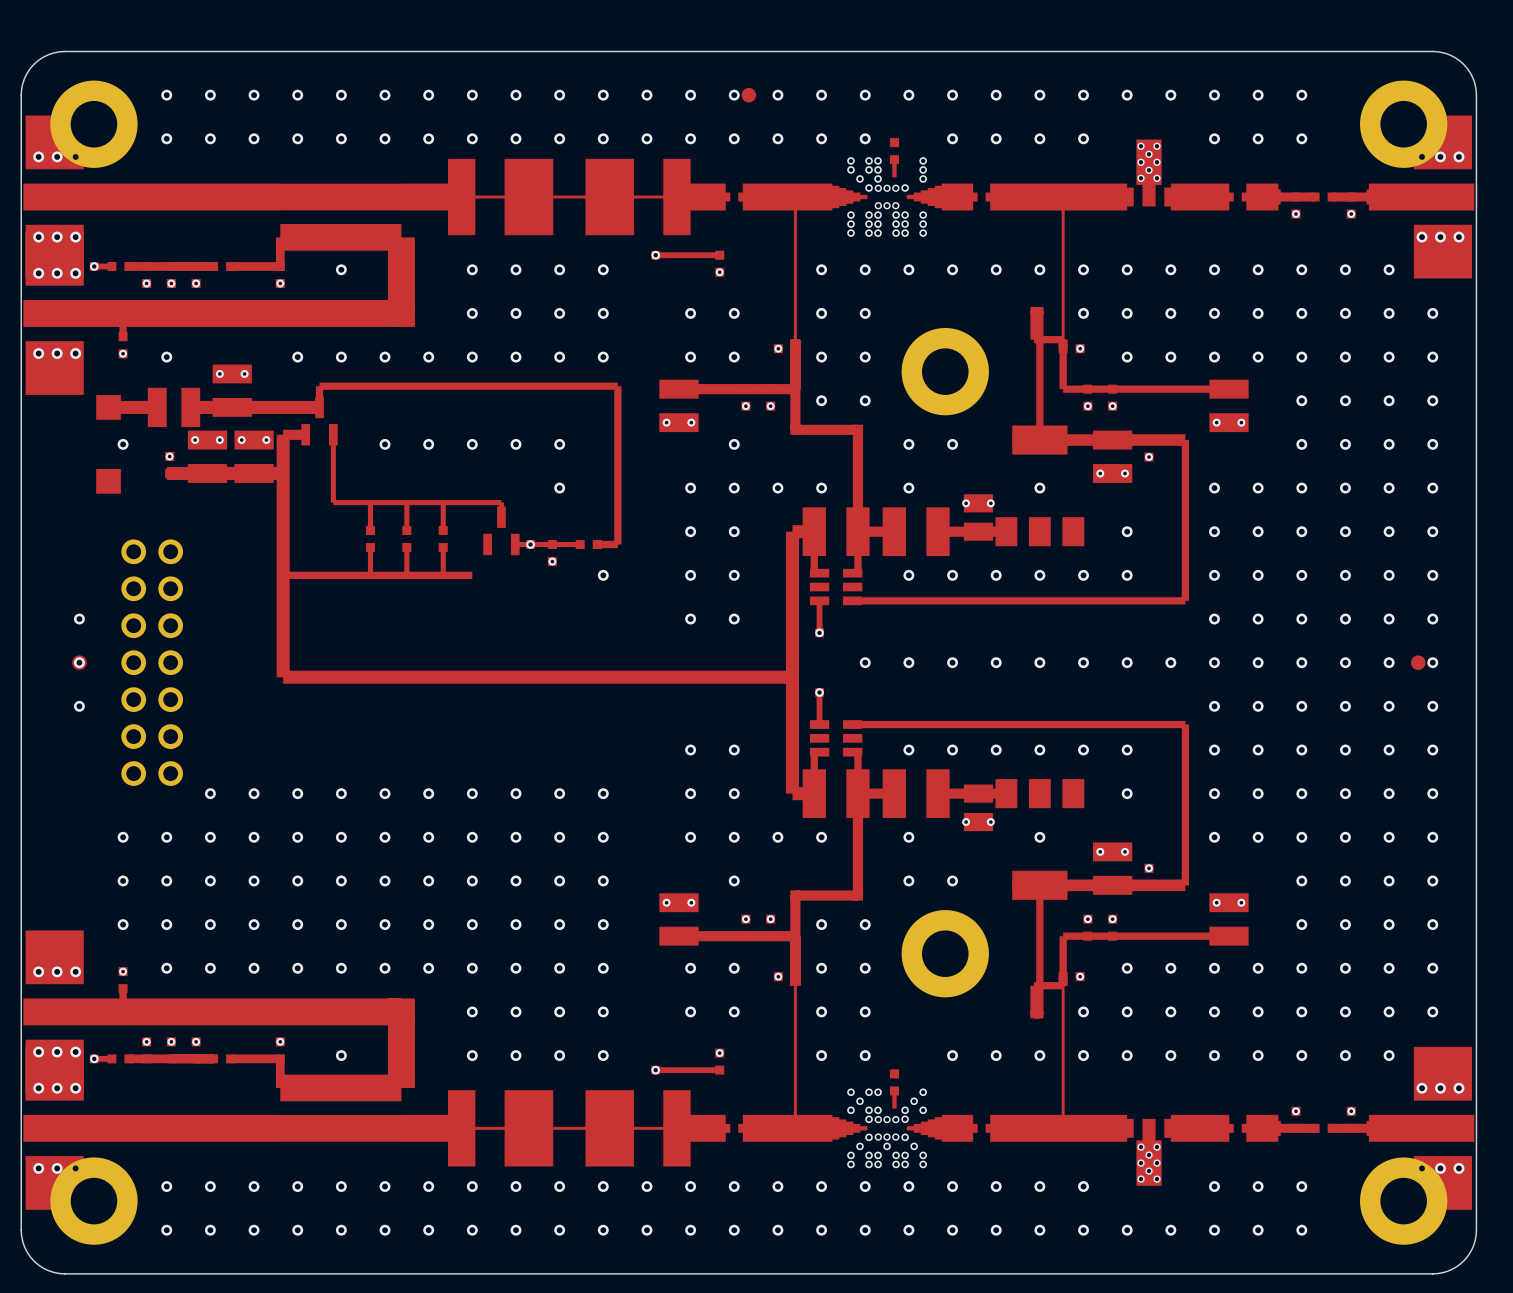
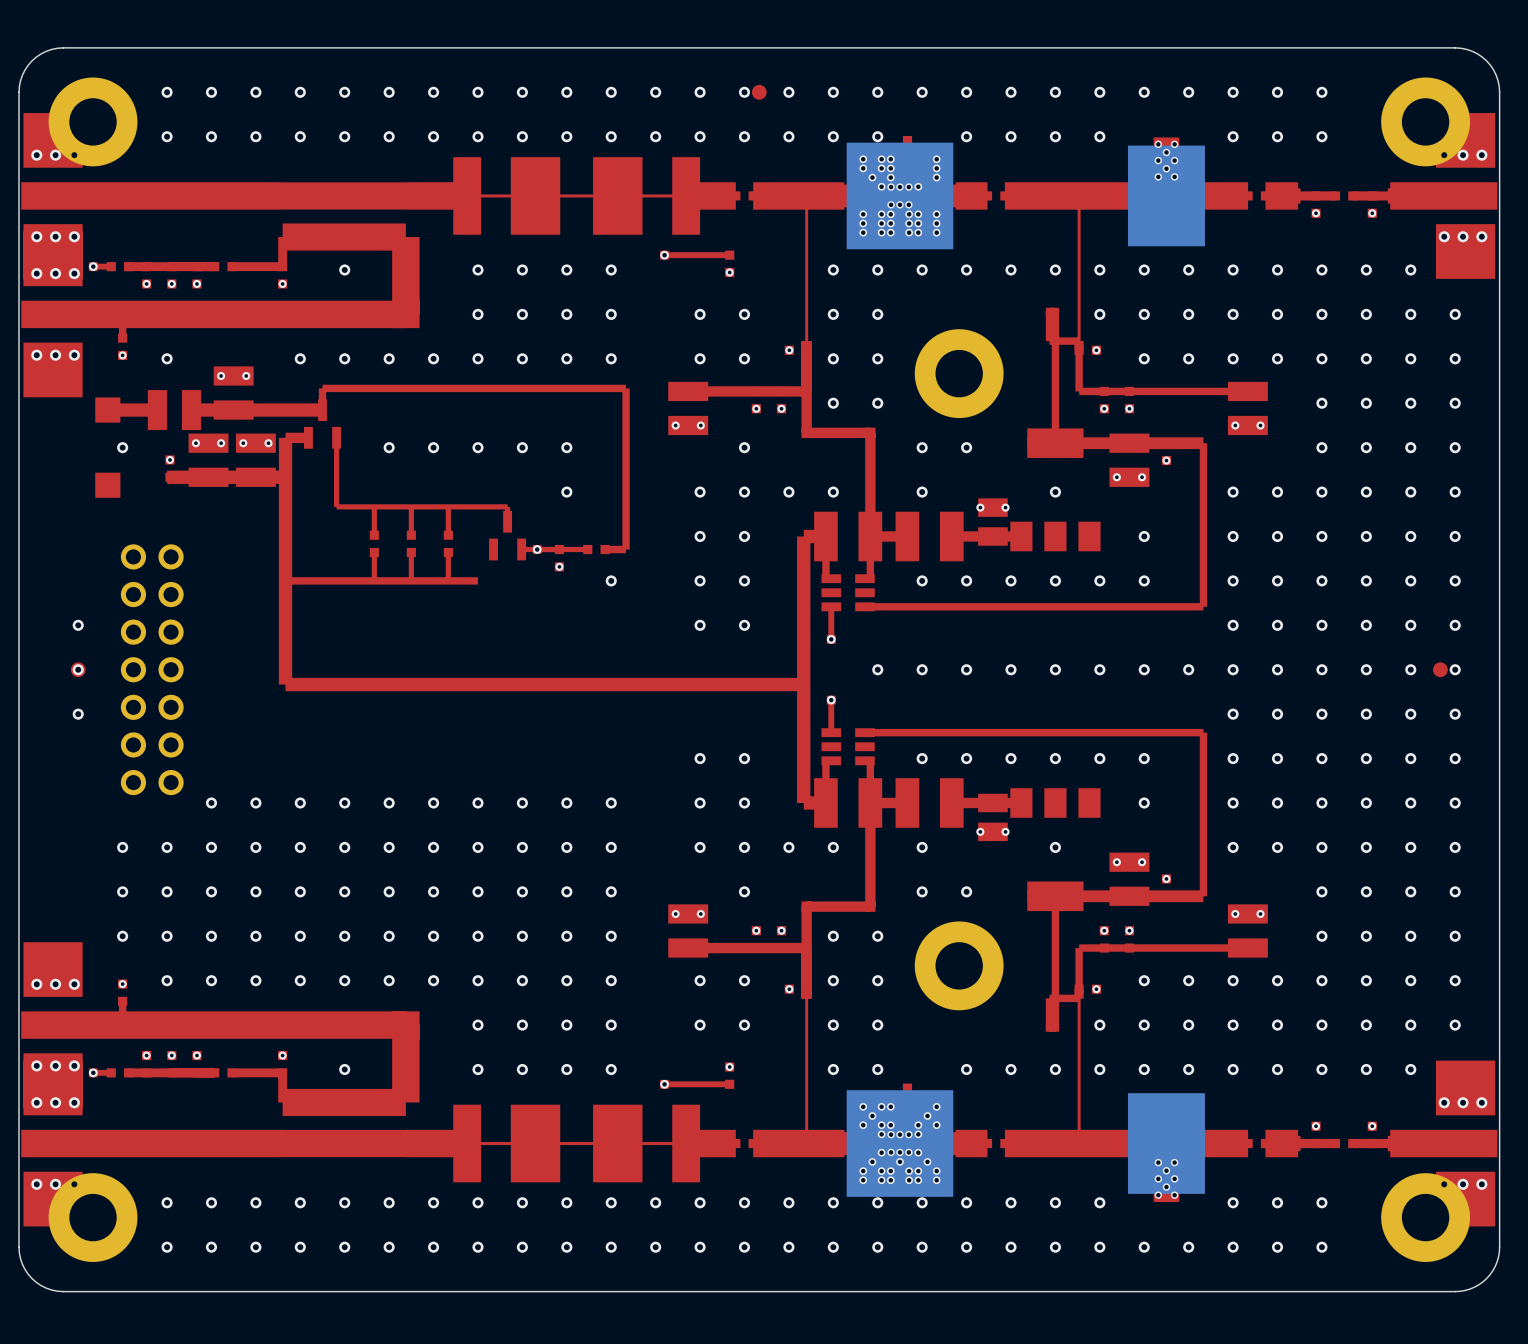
part: none -> (899, 195)
part: none -> (1166, 195)
part: none -> (899, 1143)
part: none -> (1166, 1143)

